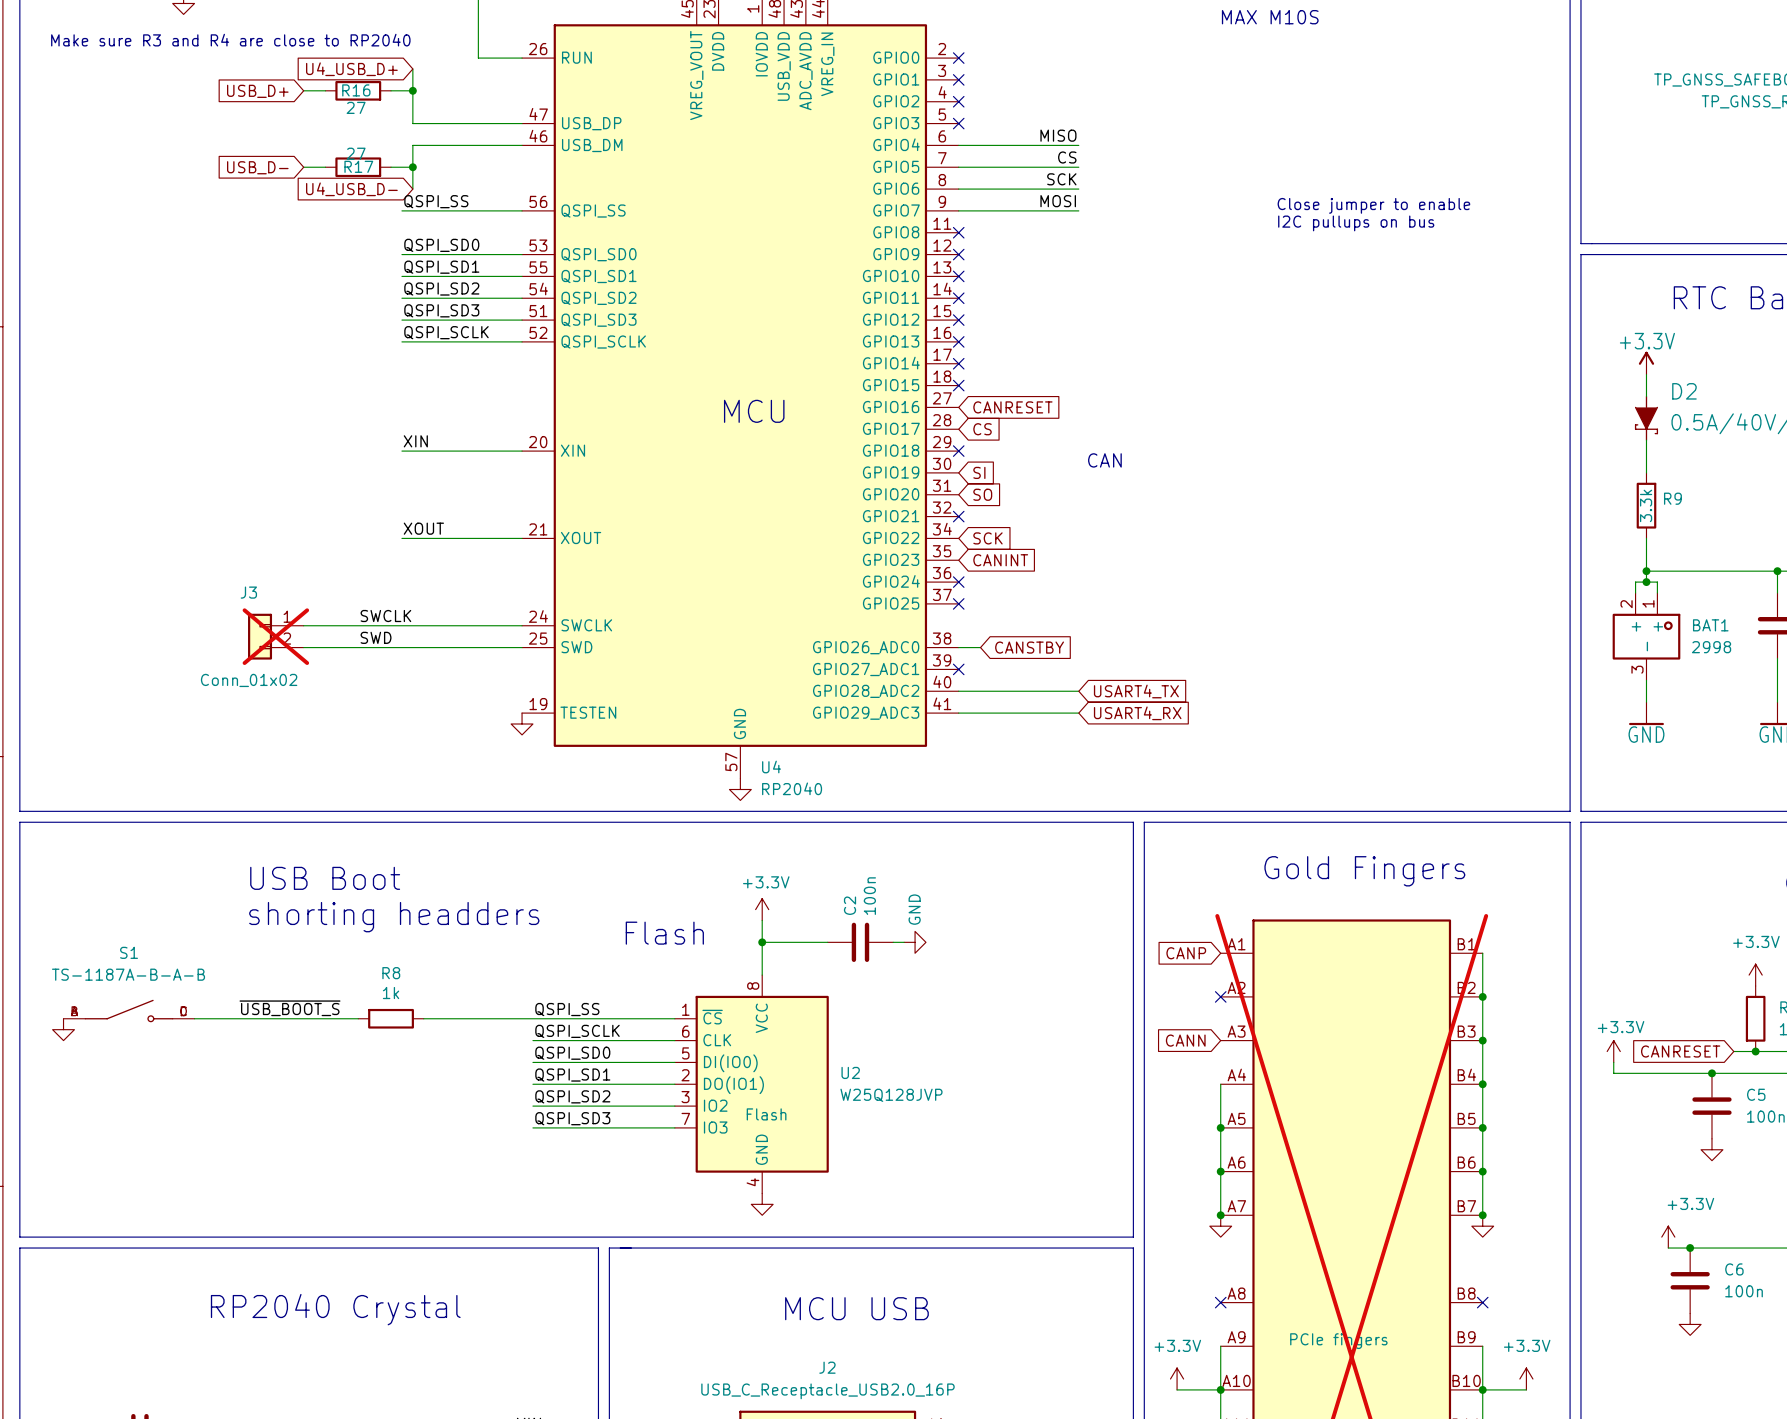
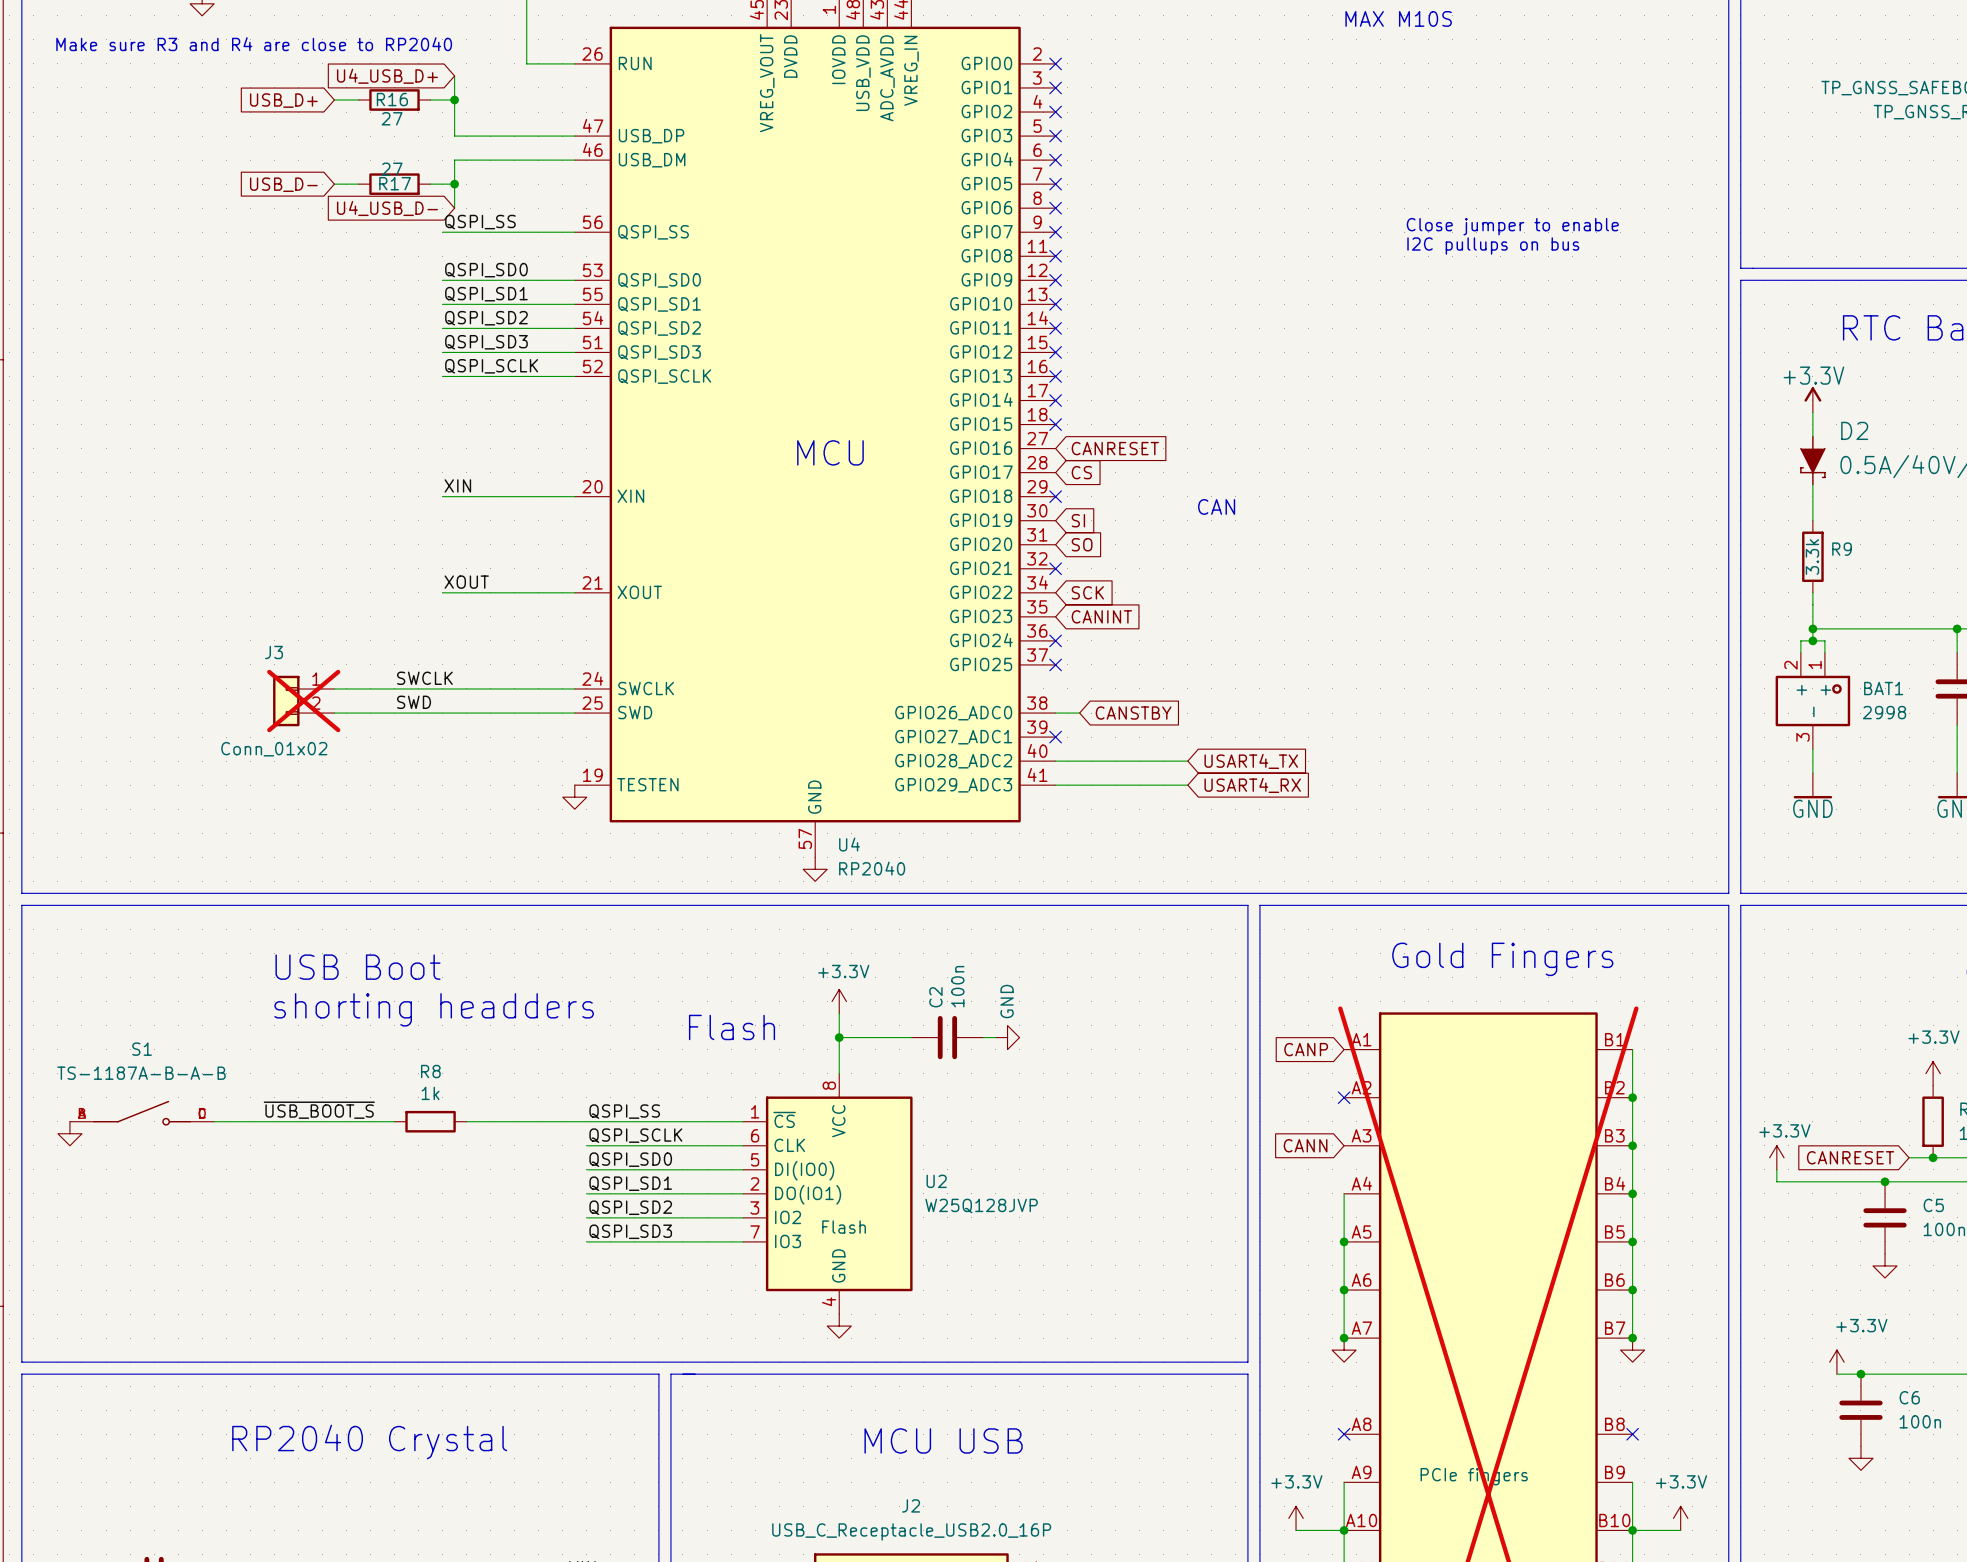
label: MISO (1058, 135) -> none
wire: (958, 145) (1078, 145) -> none
no-connect mark: none -> (1055, 160)
label: CS (1067, 157) -> none
wire: (958, 167) (1078, 167) -> none
no-connect mark: none -> (1055, 184)
label: SCK (1061, 179) -> none
wire: (958, 189) (1078, 189) -> none
no-connect mark: none -> (1055, 208)
label: MOSI (1058, 201) -> none
wire: (958, 210) (1078, 210) -> none
no-connect mark: none -> (1055, 232)

